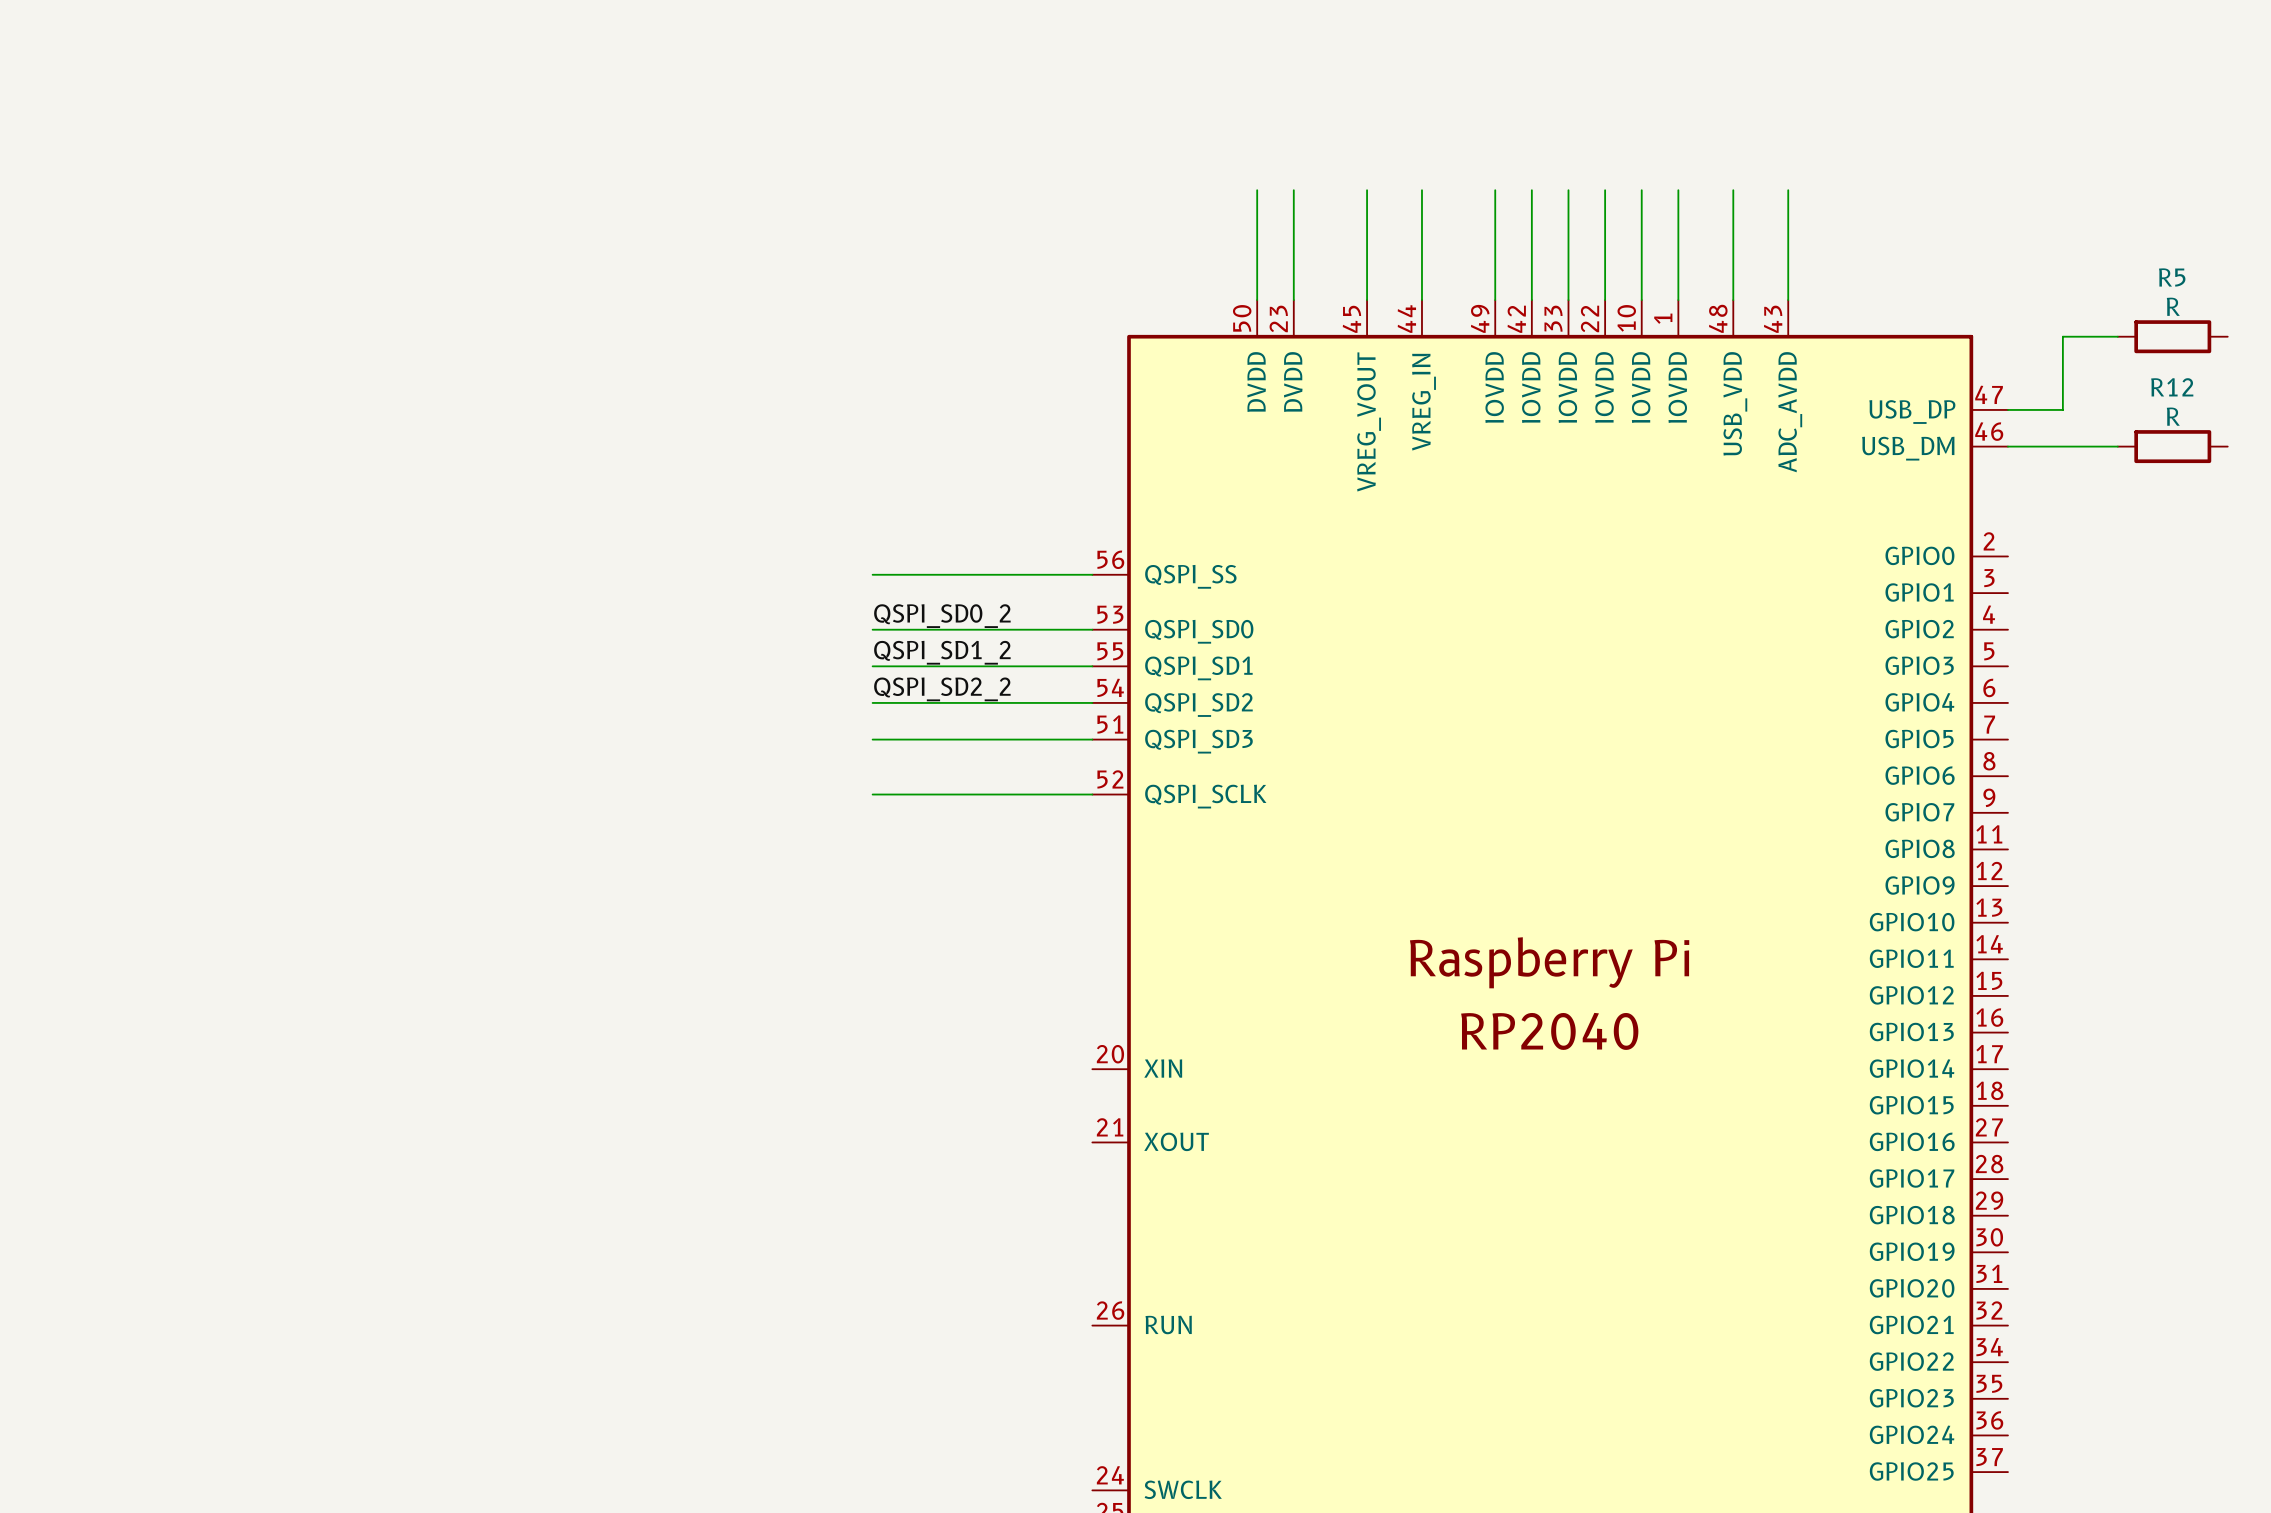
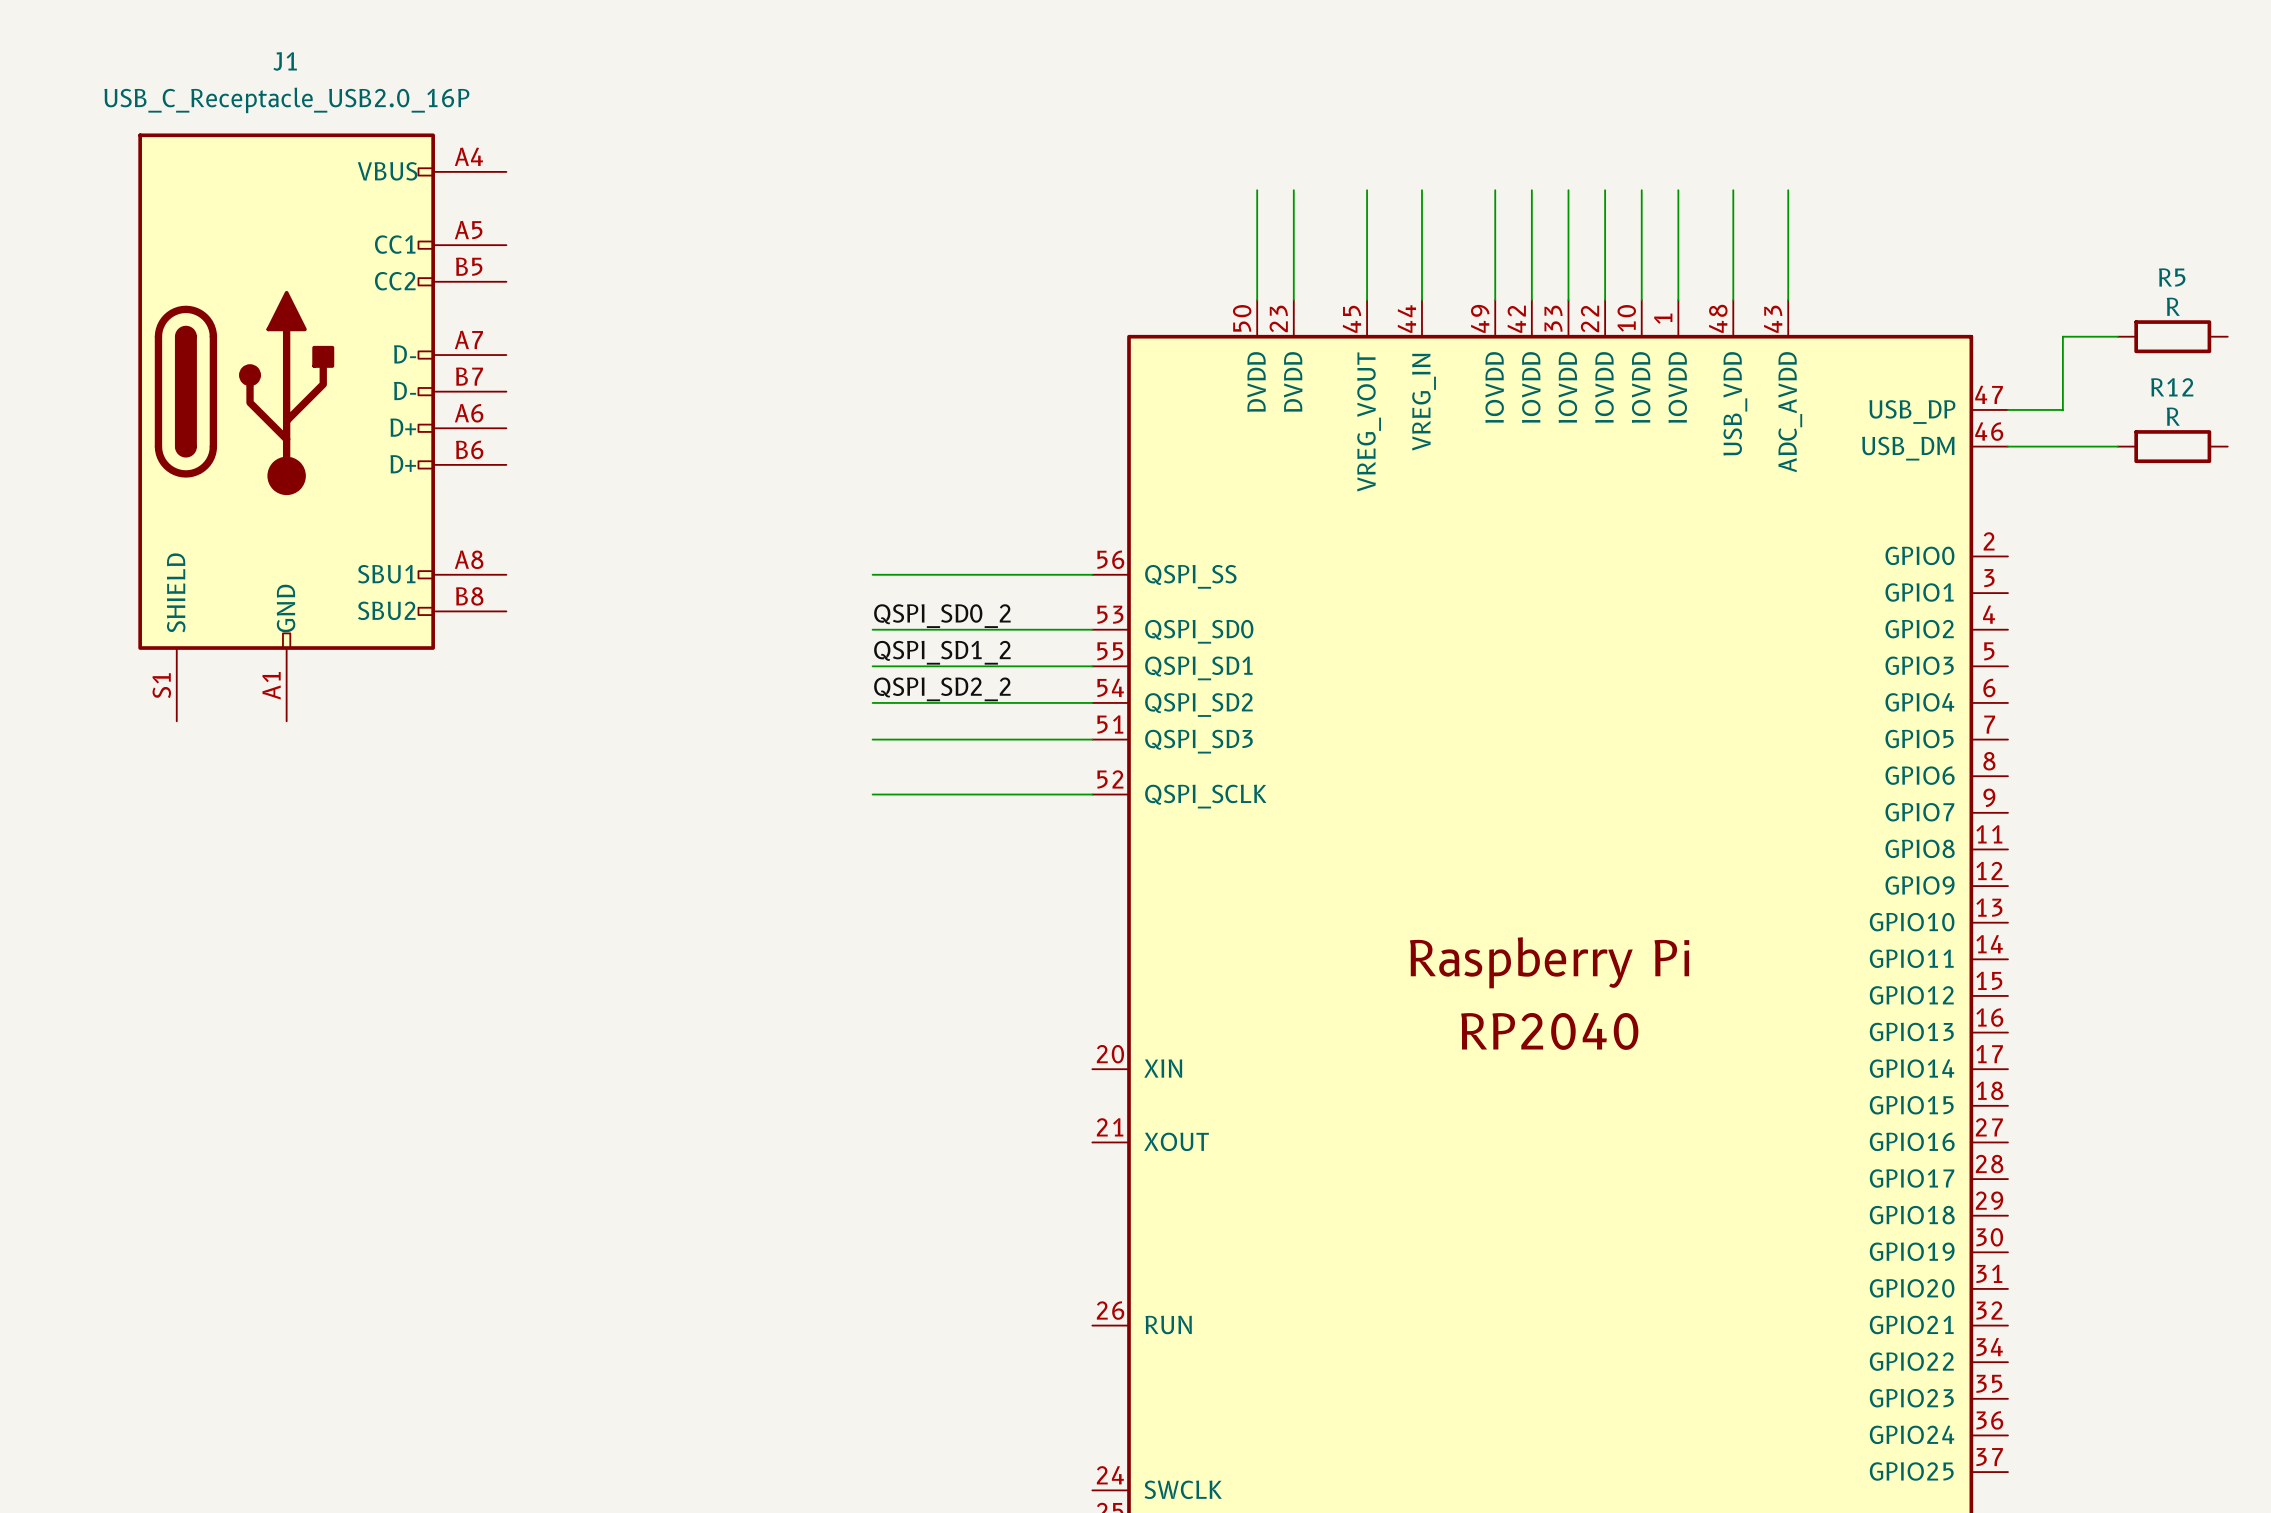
J1: none -> USB_C_Receptacle_USB2.0_16P (322, 427)

